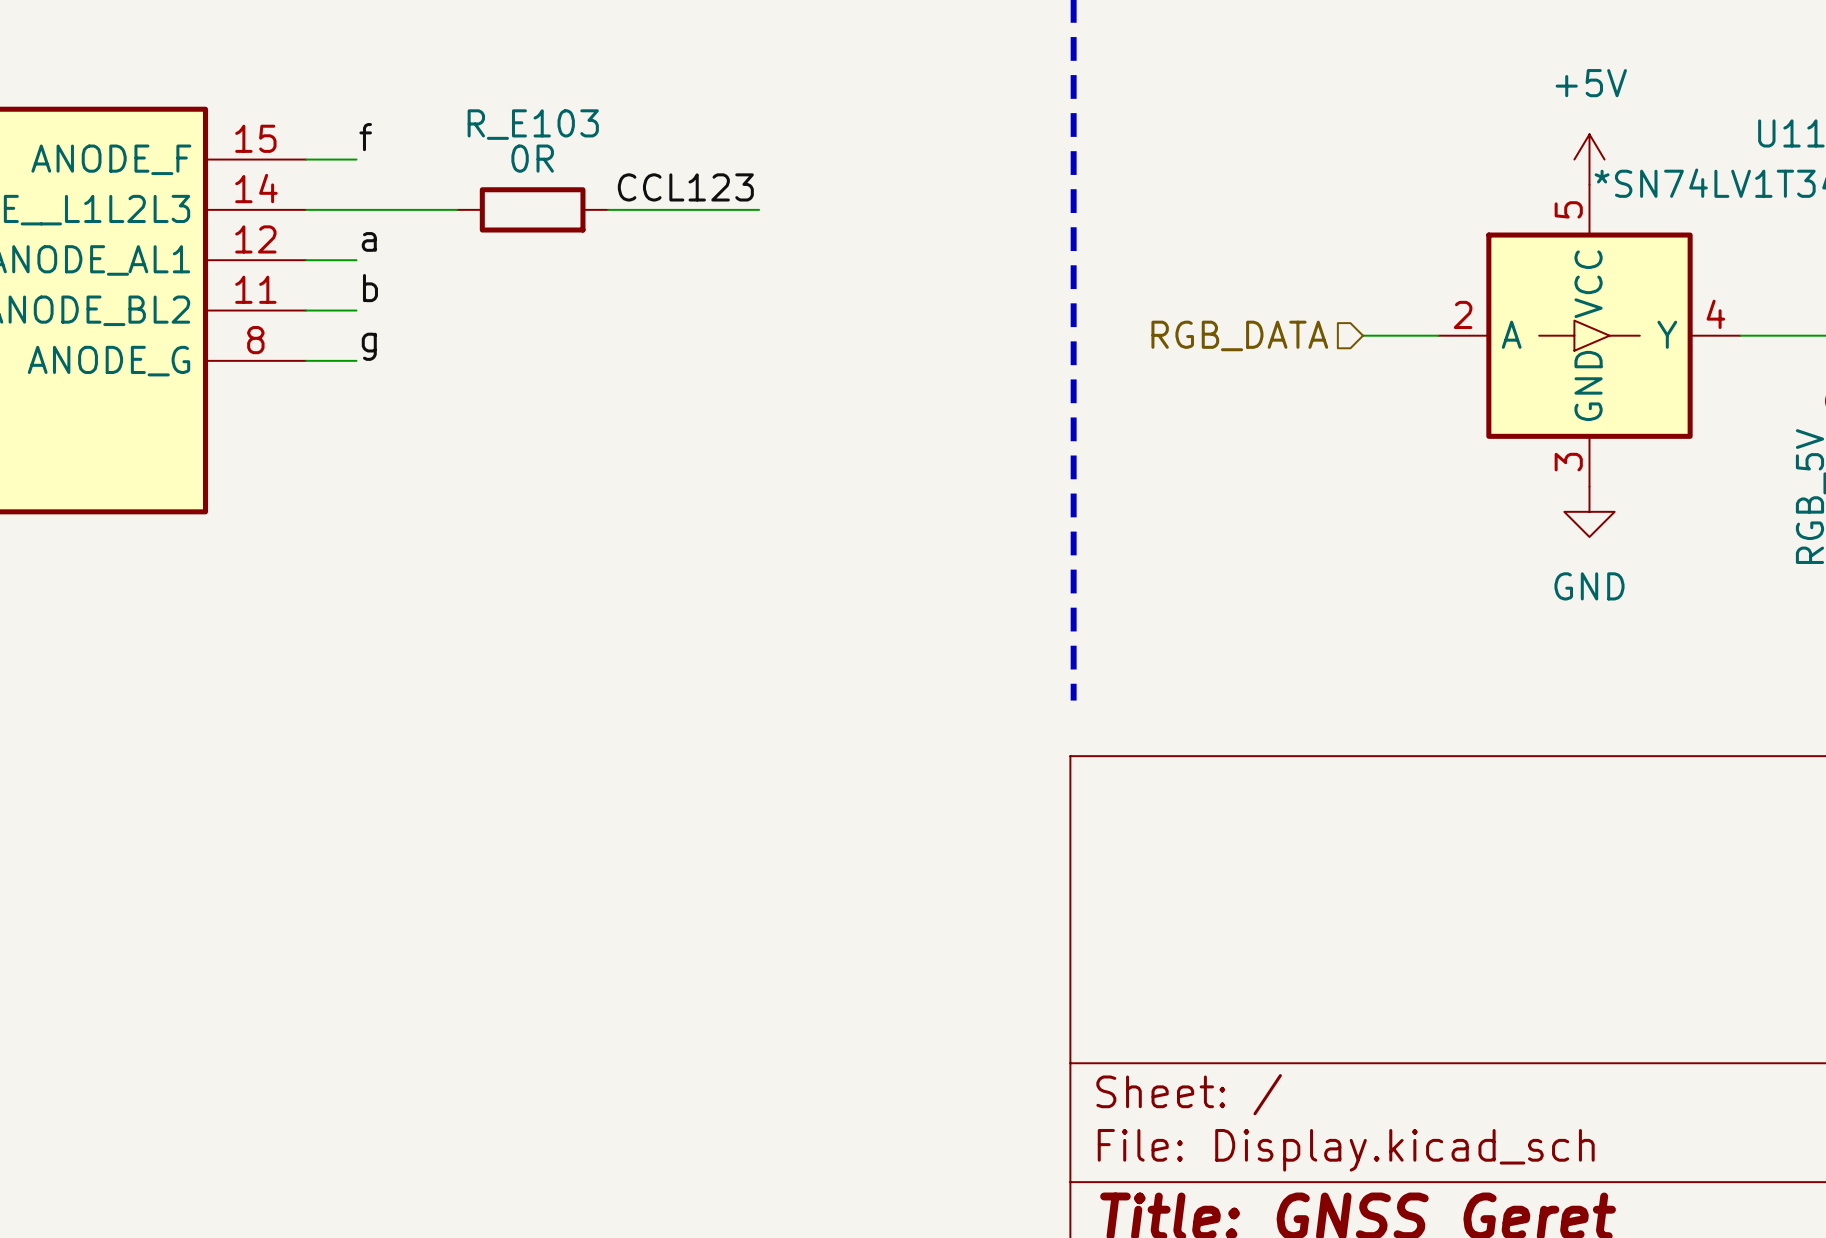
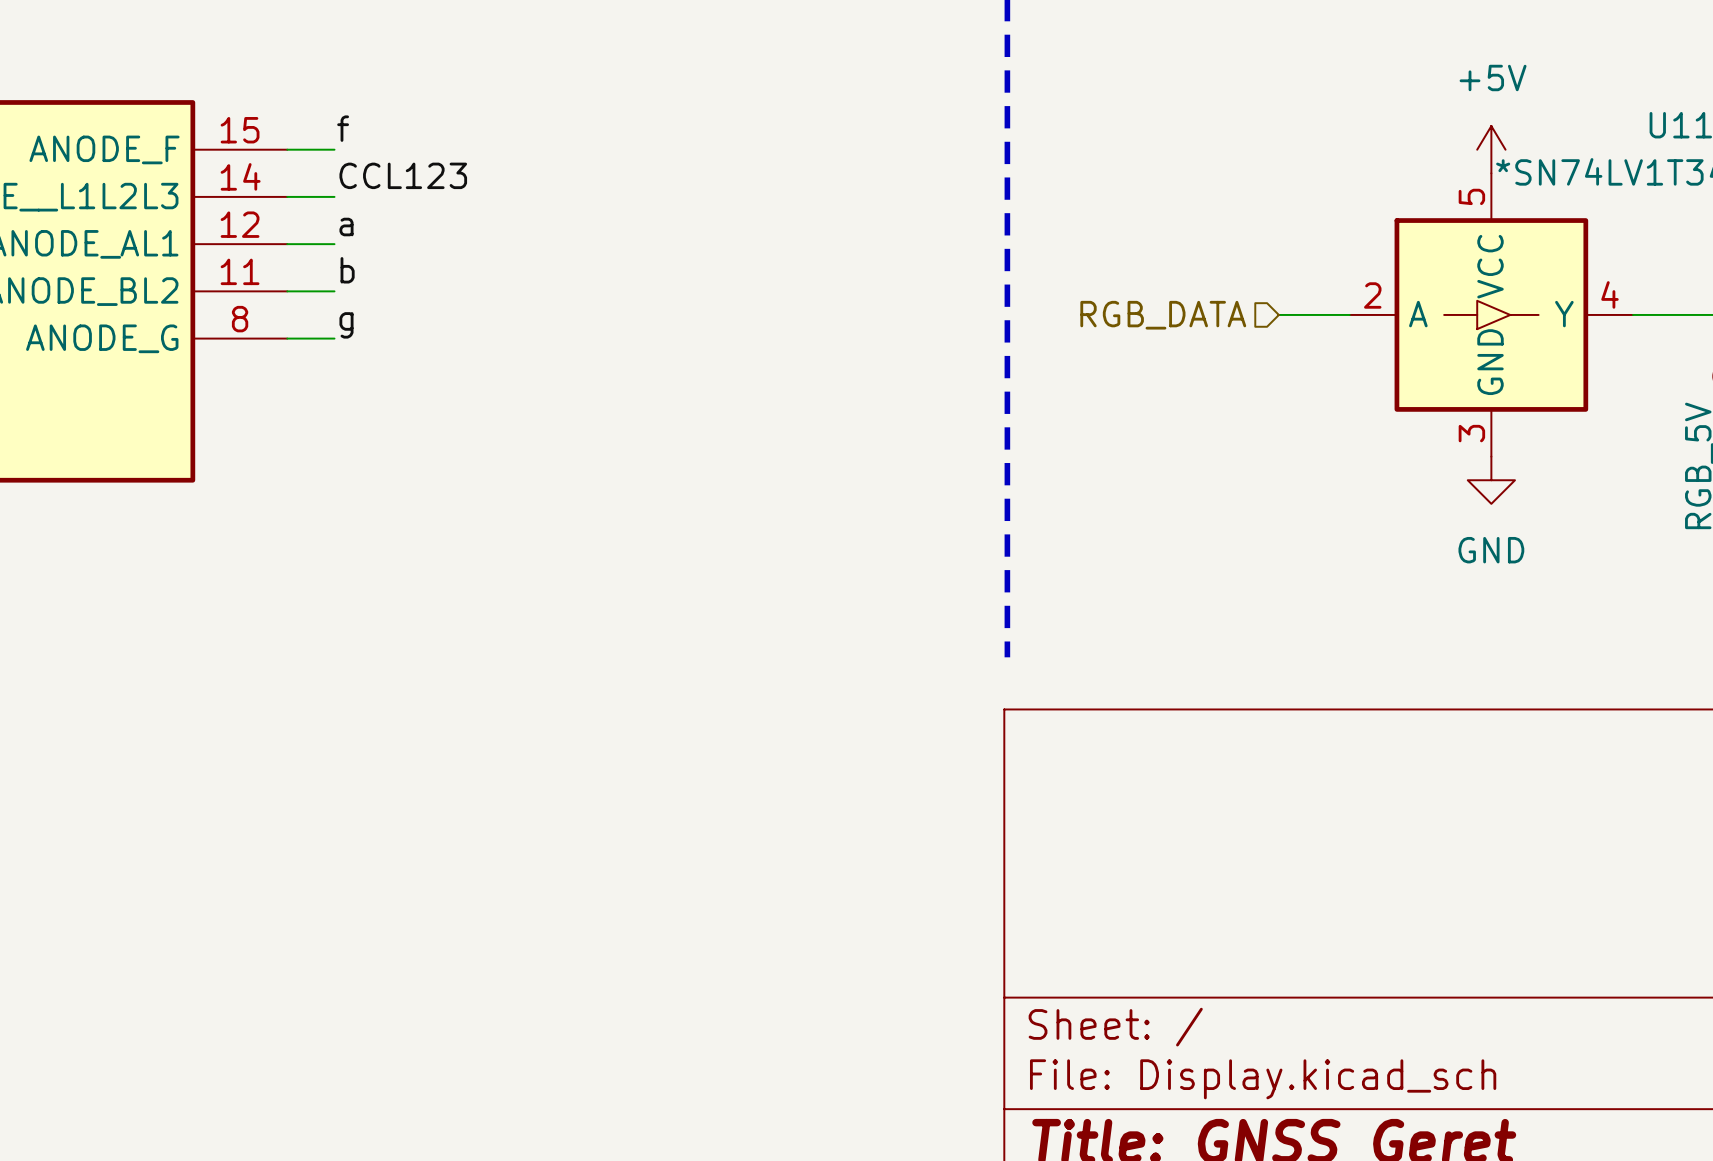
label position: CCL123 (685, 187) -> CCL123 (403, 175)
wire: (356, 209) (457, 209) -> none
R_E103: 0R (532, 209) -> none
wire: (608, 209) (759, 209) -> none

